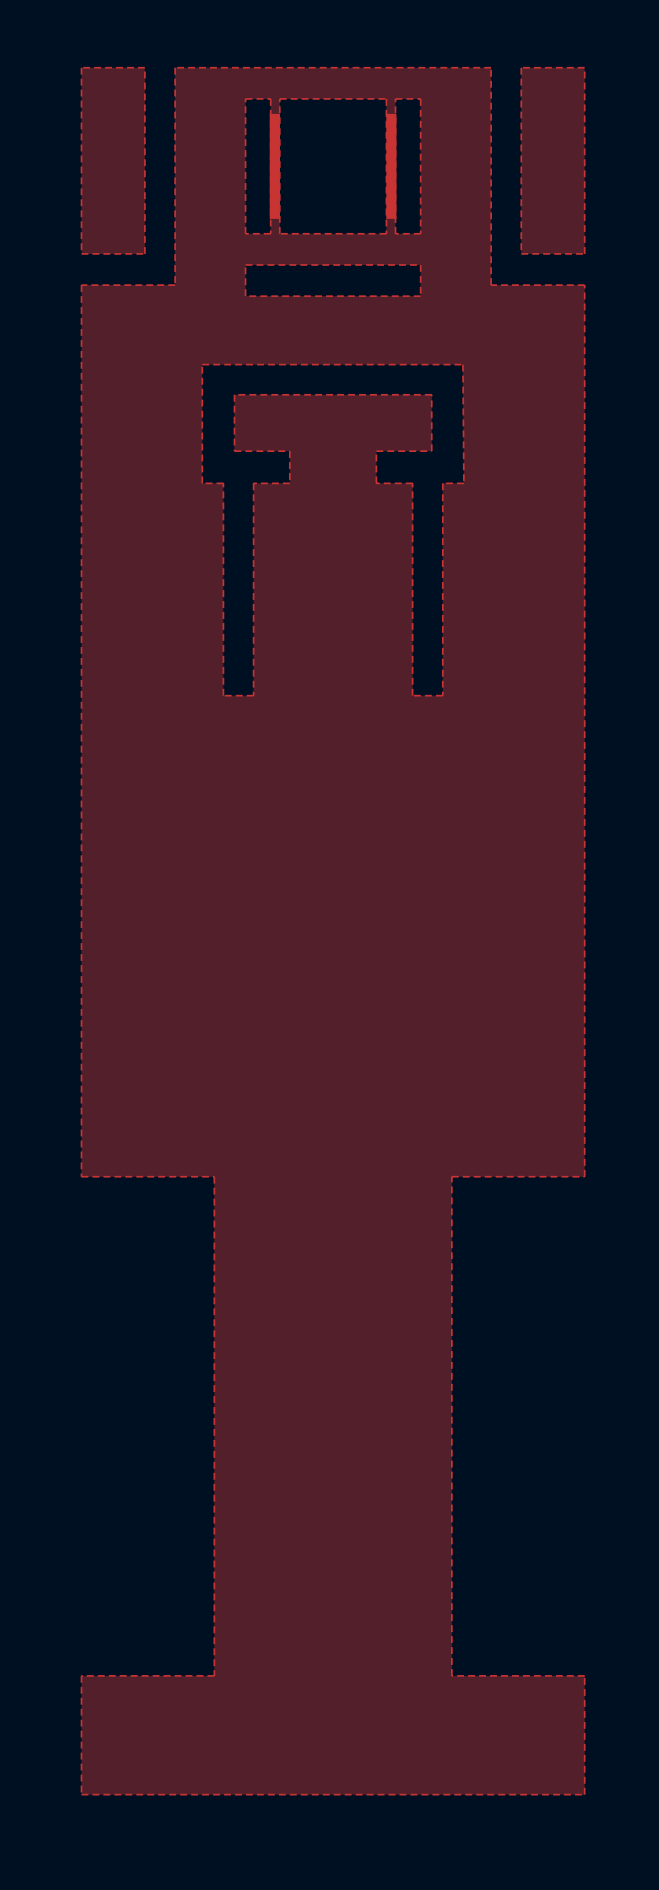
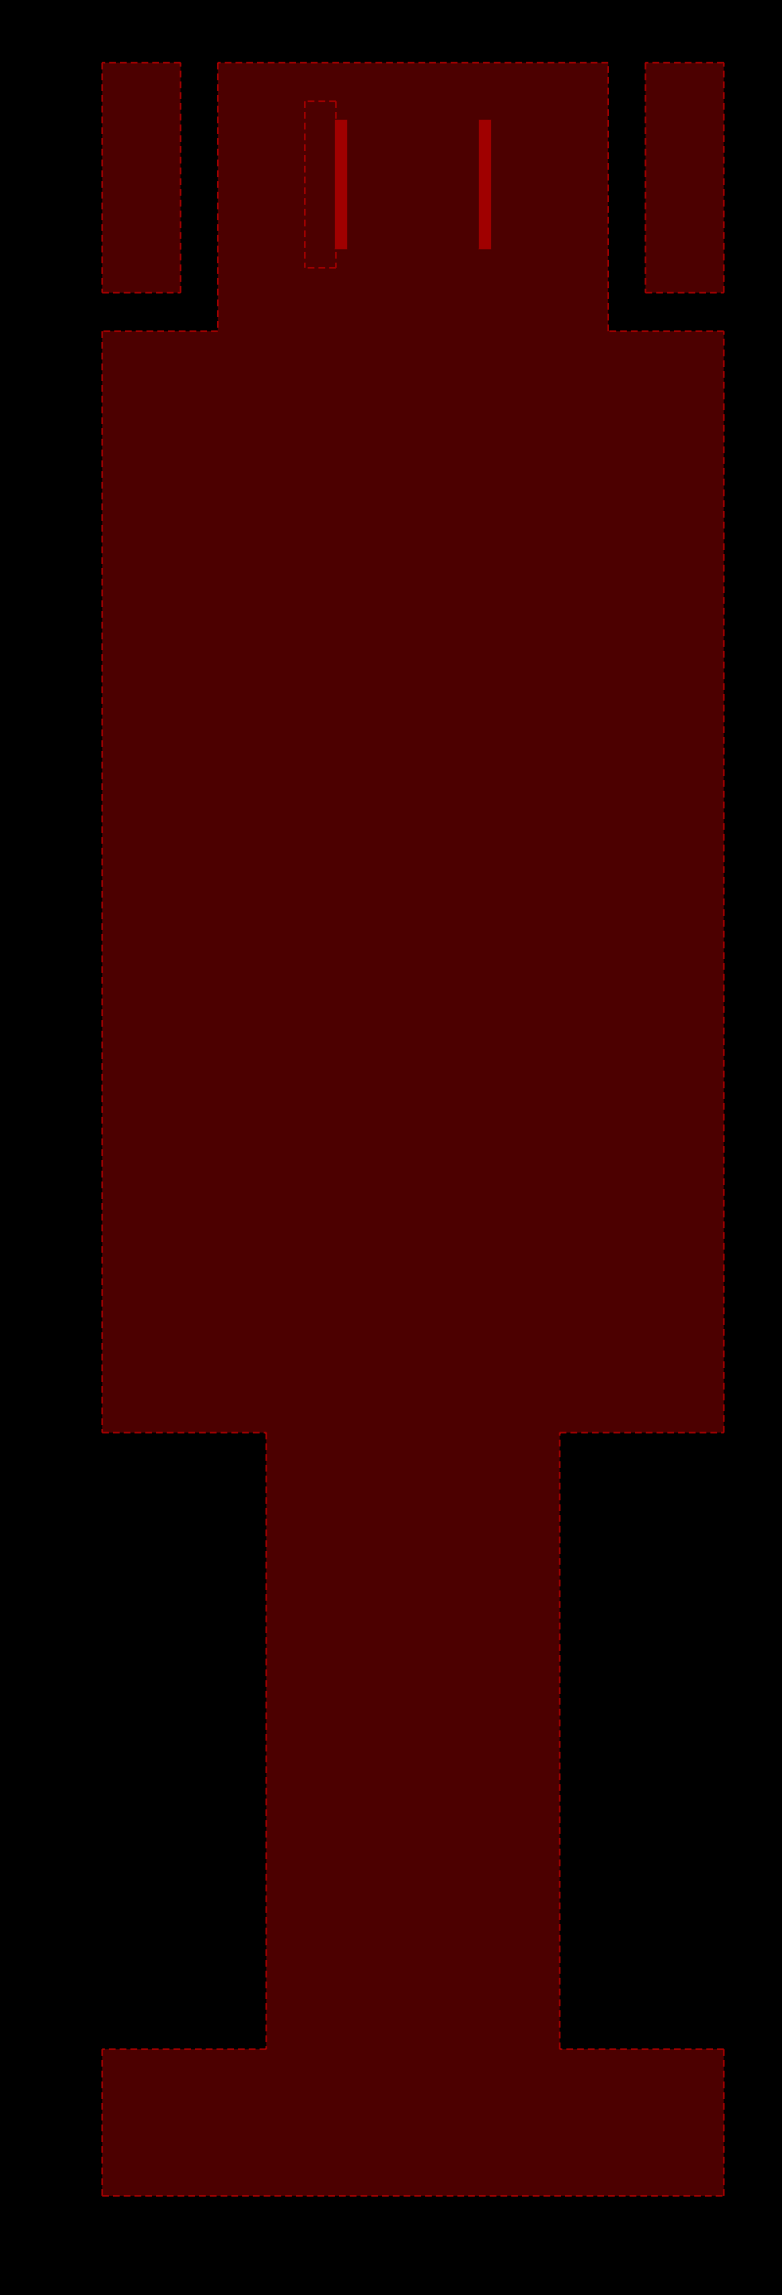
top zone outline: (386, 98) (279, 98) (279, 233) (386, 233) (386, 98) -> none
top zone outline: (420, 98) (420, 233) (395, 233) (395, 98) (420, 98) -> none
top zone outline: (420, 264) (245, 264) (245, 296) (420, 296) (420, 264) -> none
top zone outline: (462, 364) (202, 364) (202, 483) (223, 483) (223, 695) (253, 695) (253, 483) (289, 483) (289, 451) (234, 451) (234, 394) (431, 394) (431, 451) (376, 451) (376, 483) (412, 483) (412, 695) (442, 695) (442, 483) (463, 483) (462, 364) -> none

